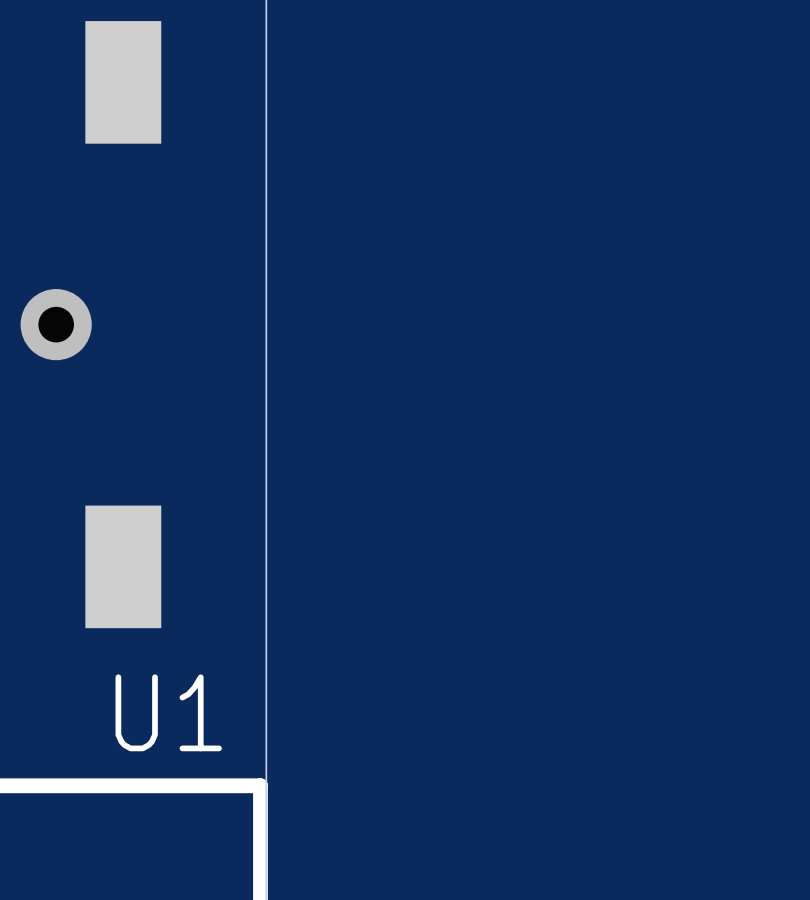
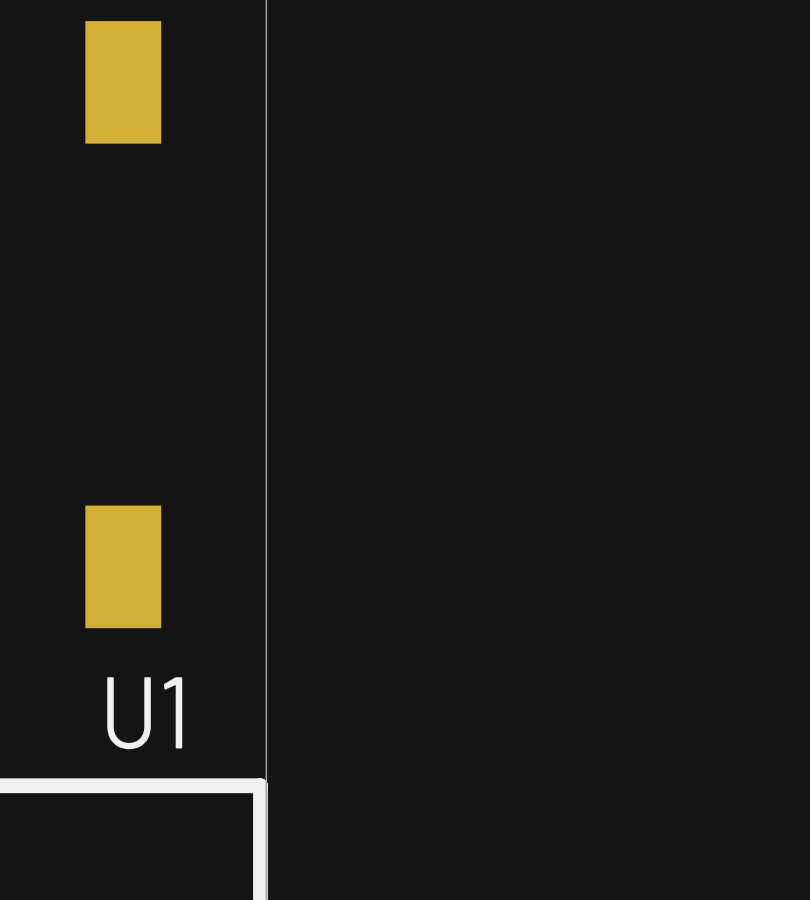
via: (56, 324) -> none

